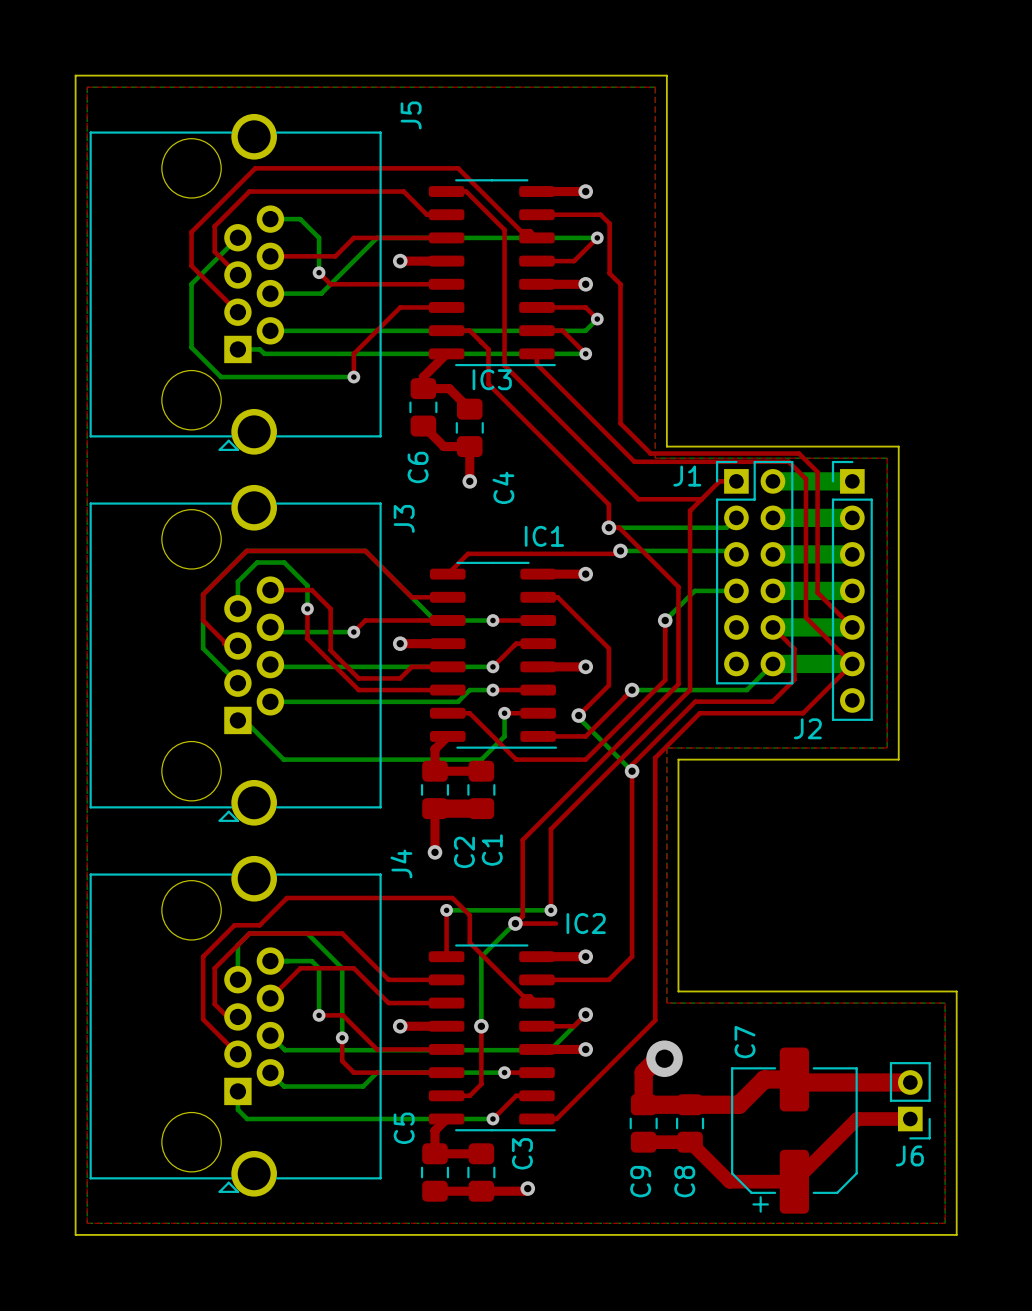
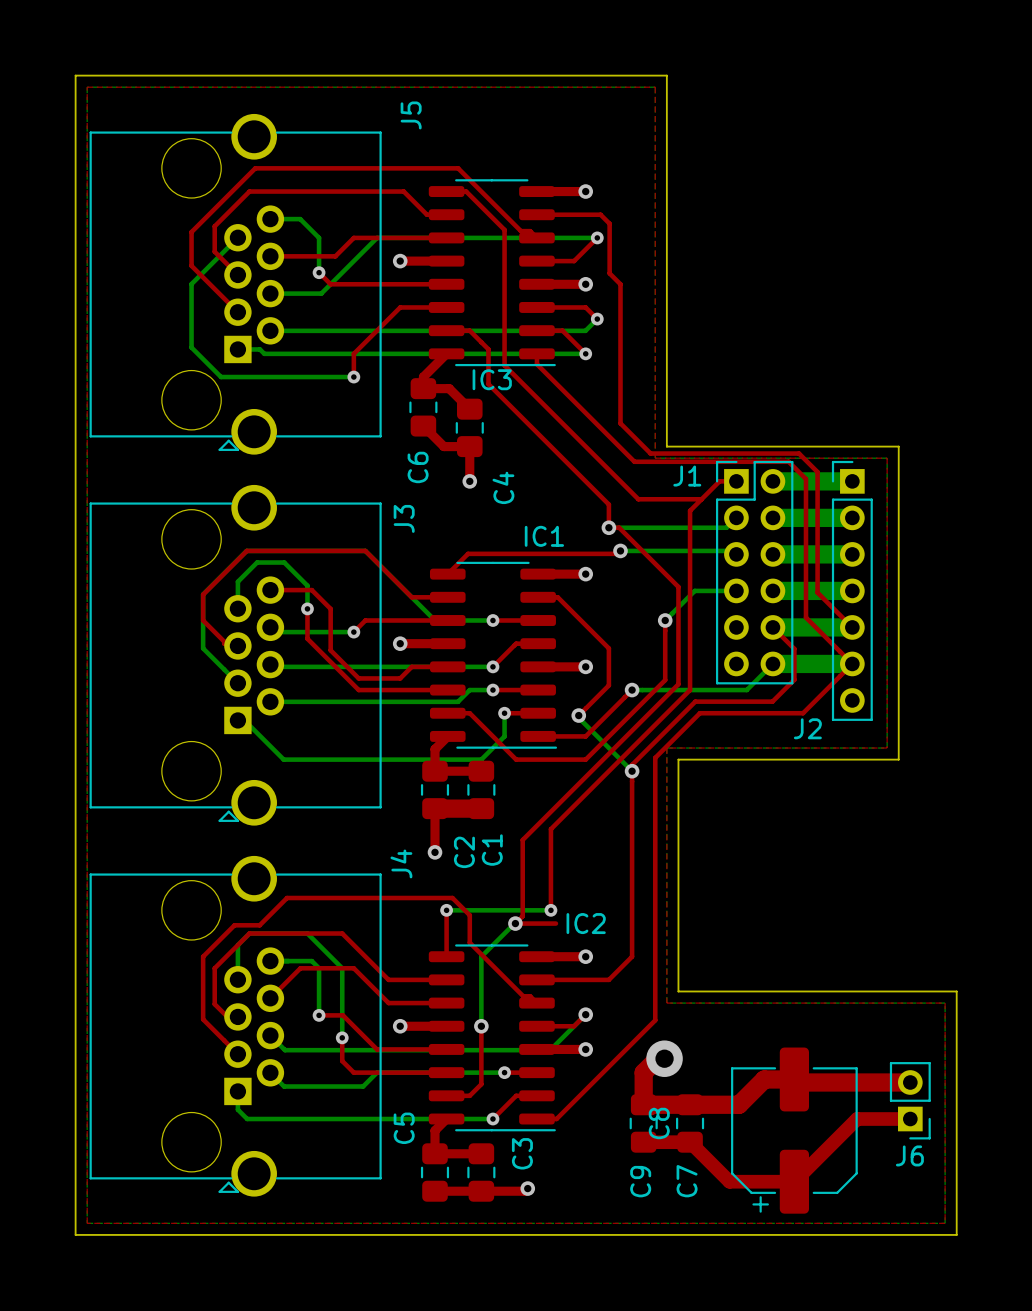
C7 name position: C7 (745, 1042) -> C7 (687, 1181)
C8 name position: C8 (684, 1181) -> C8 (659, 1123)

